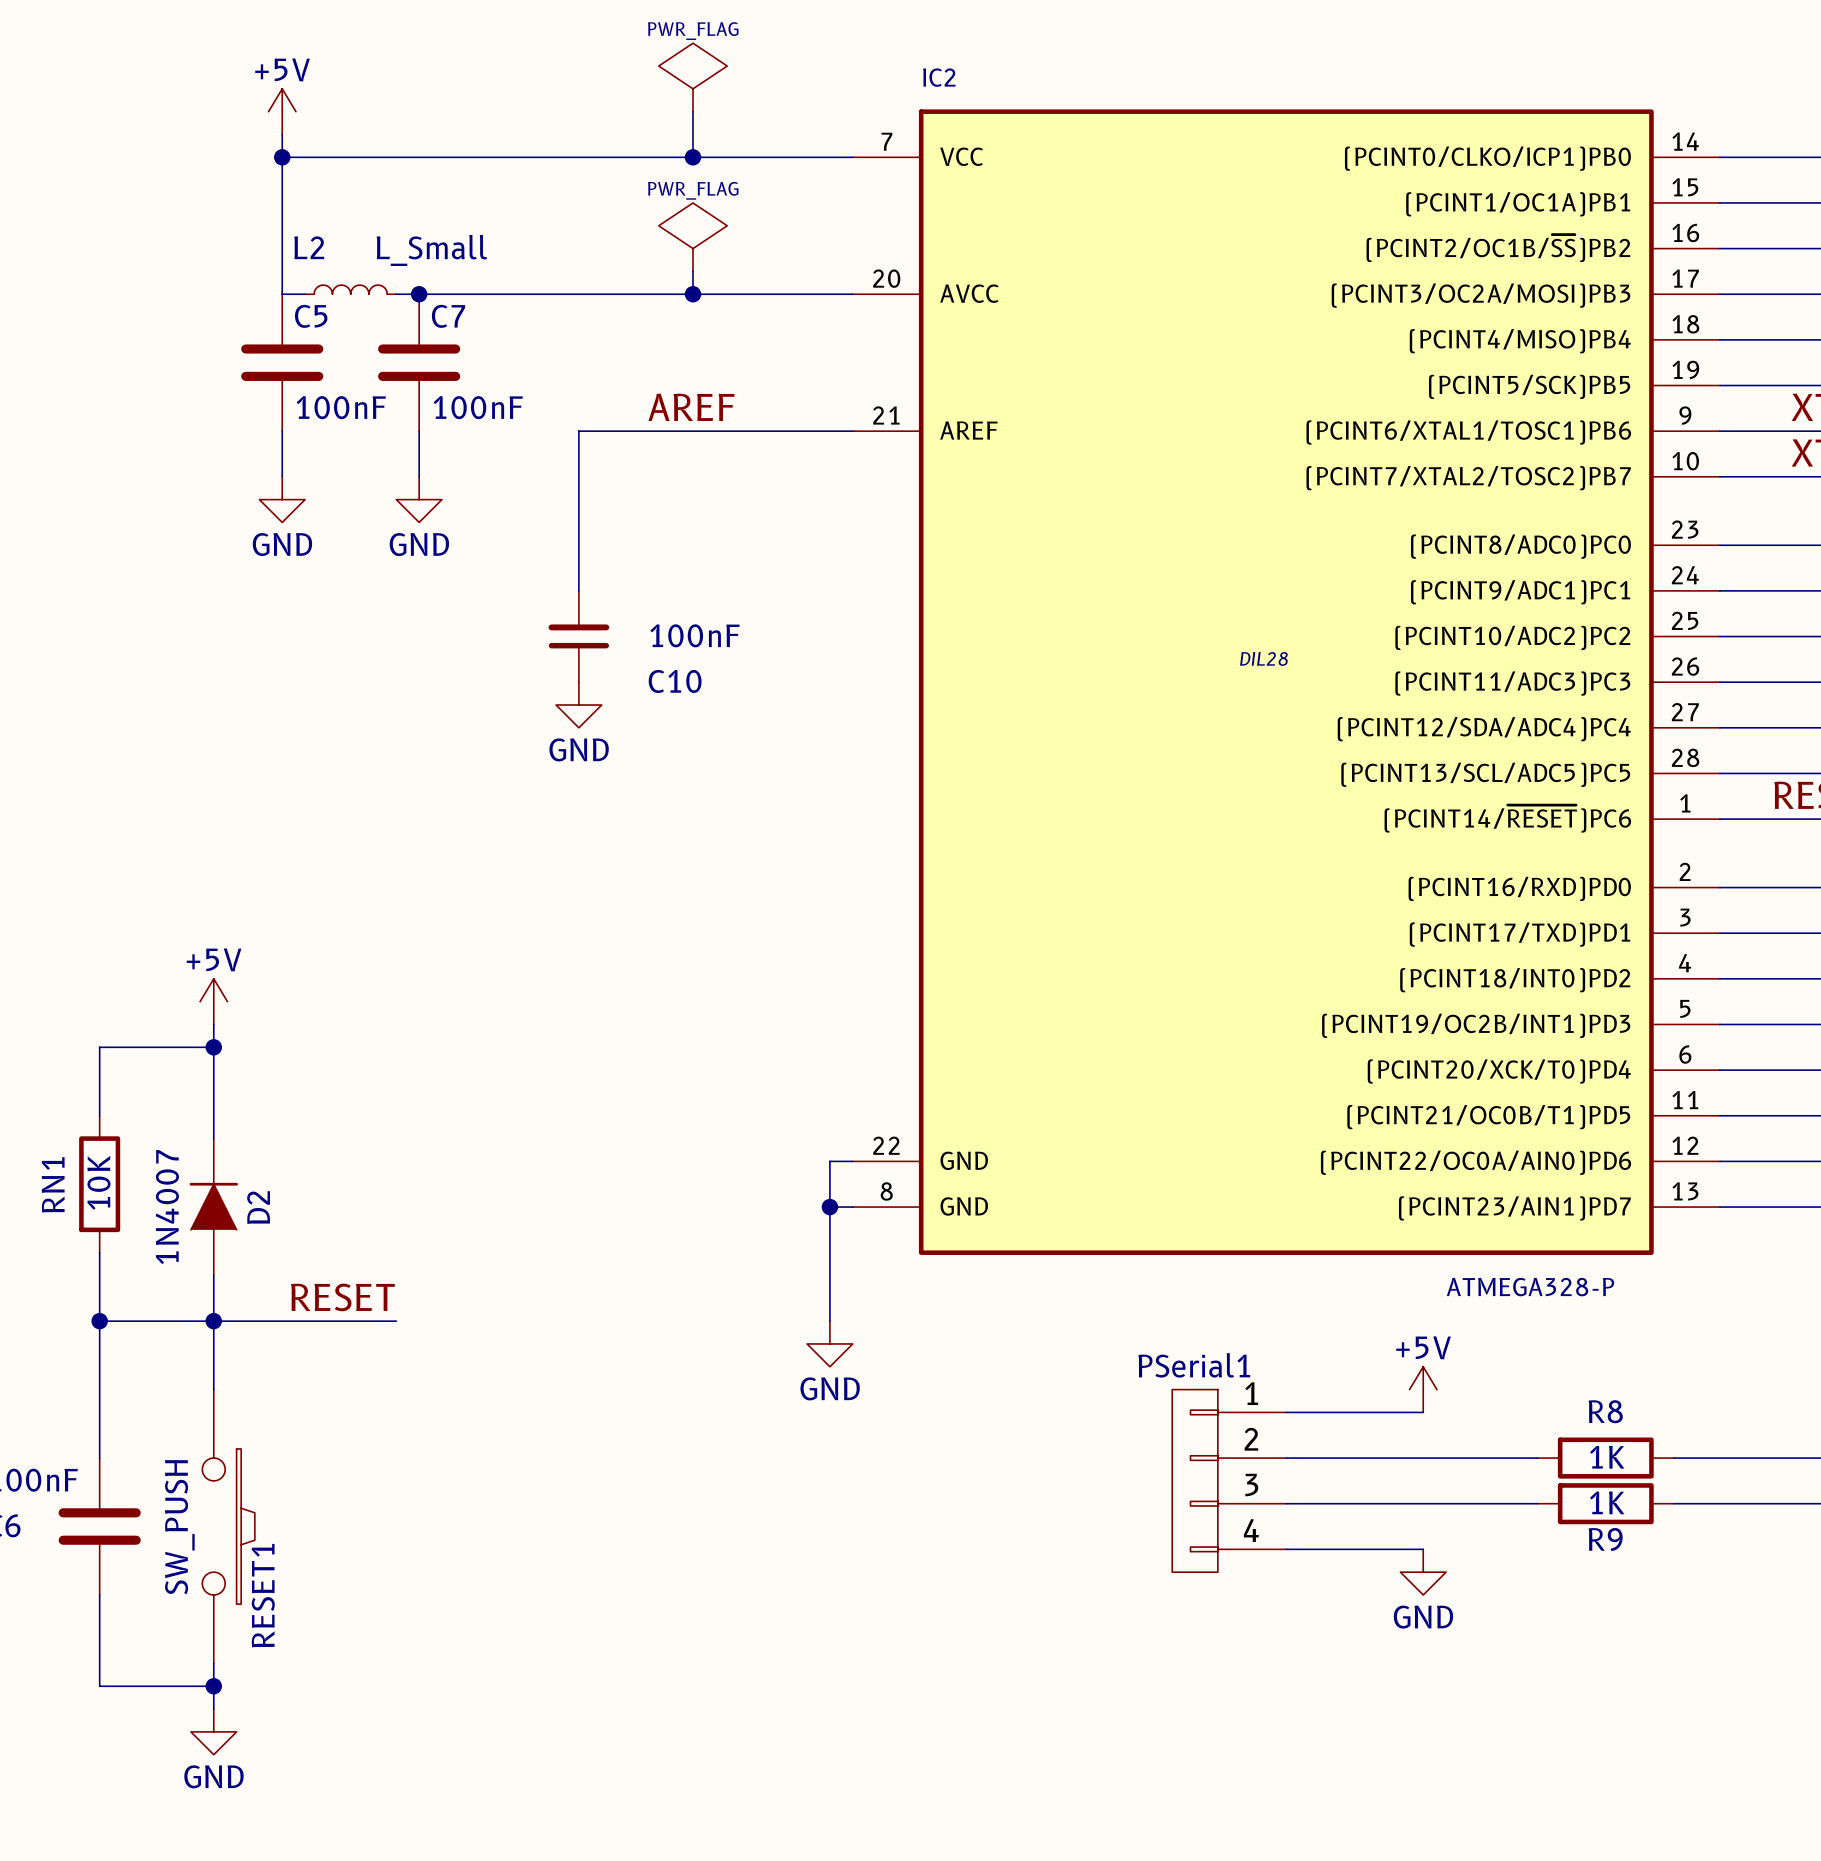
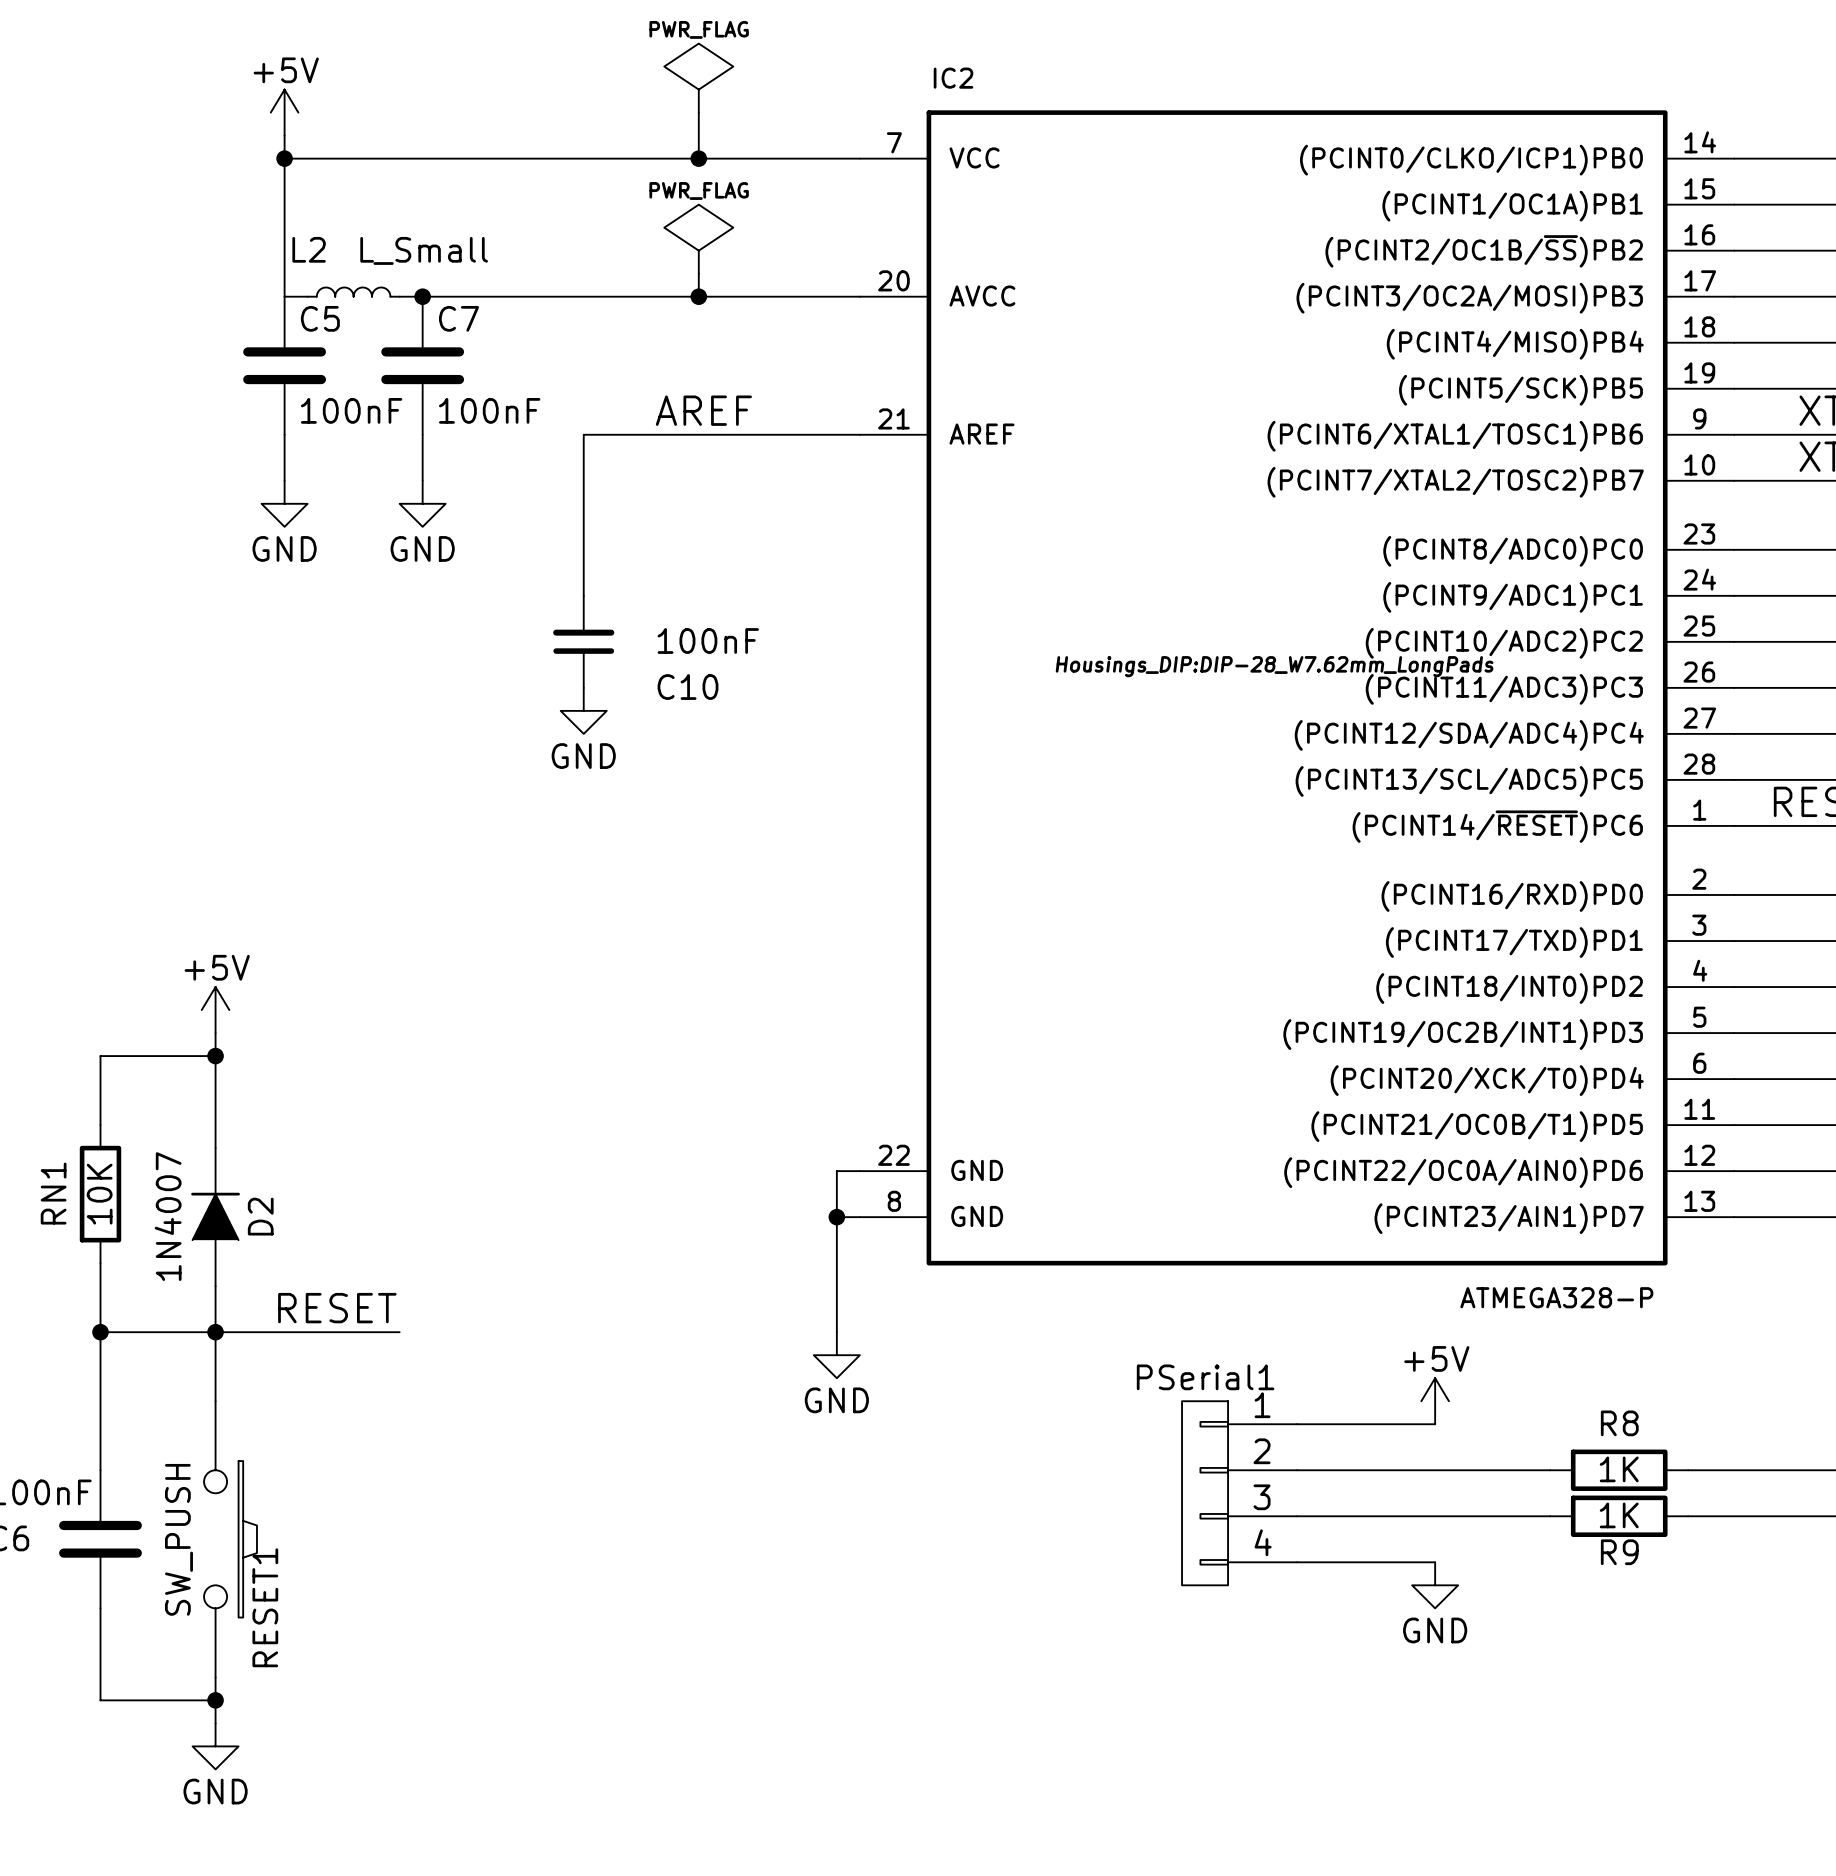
IC2 text: DIL28 (1263, 658) -> Housings_DIP:DIP-28_W7.62mm_LongPads (1274, 666)

